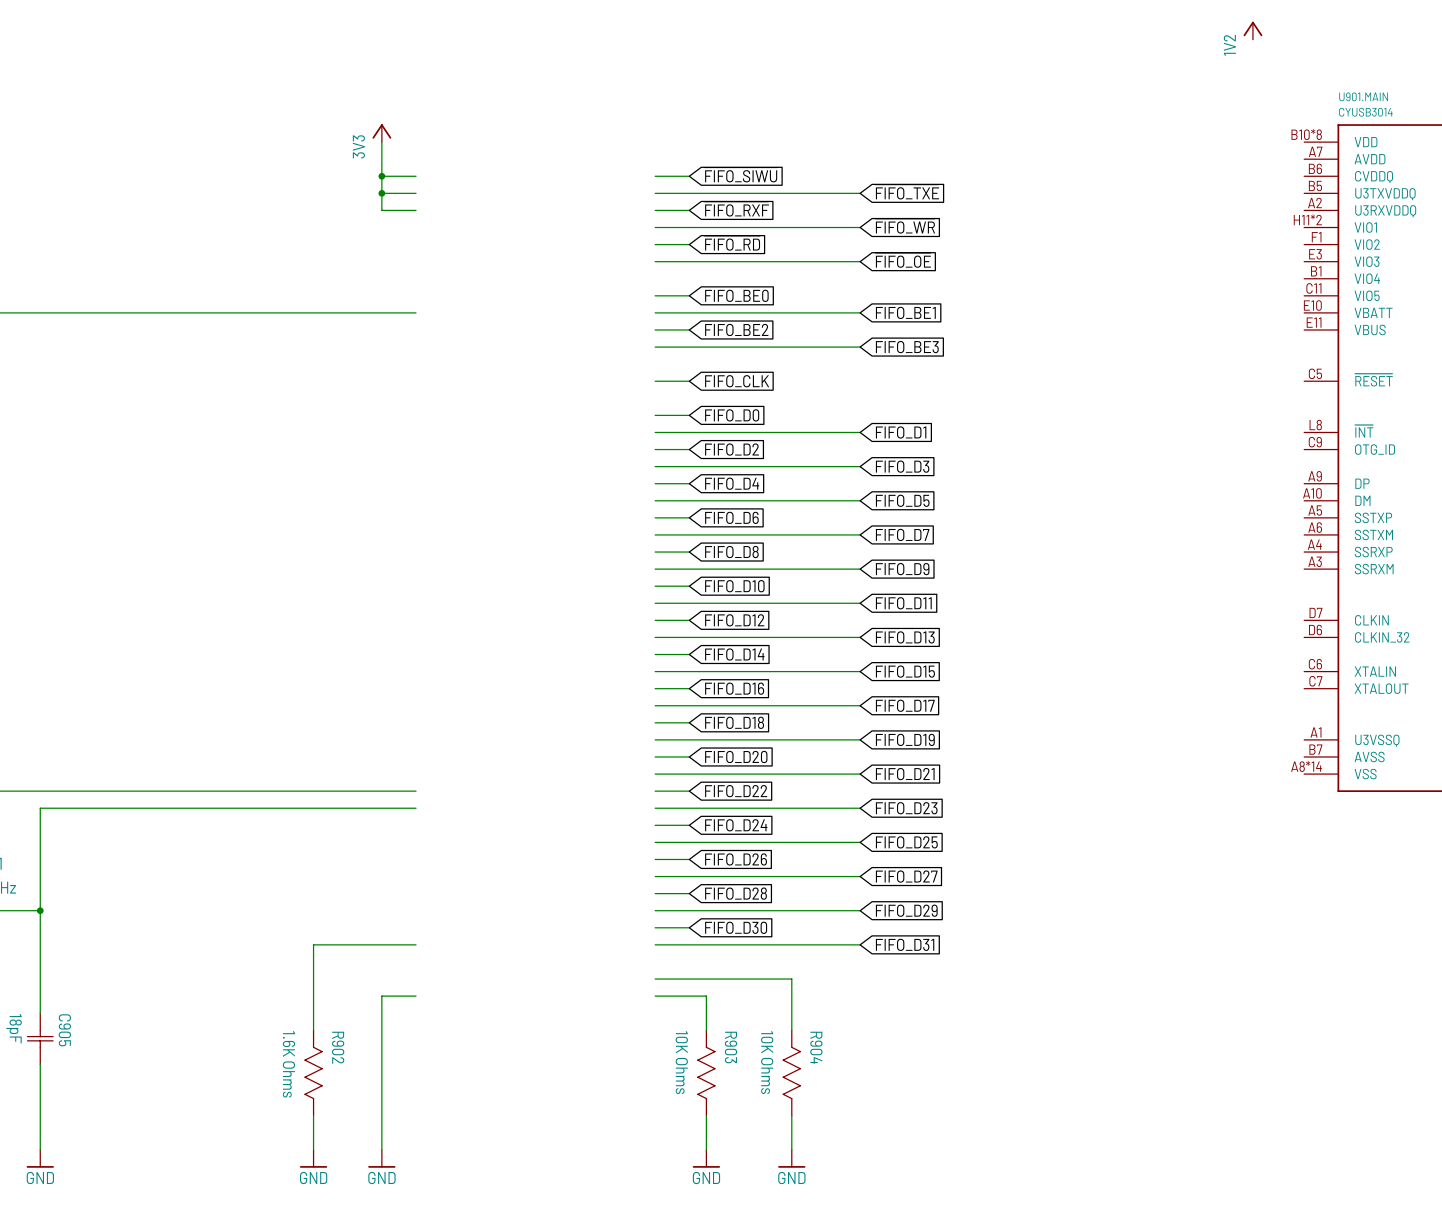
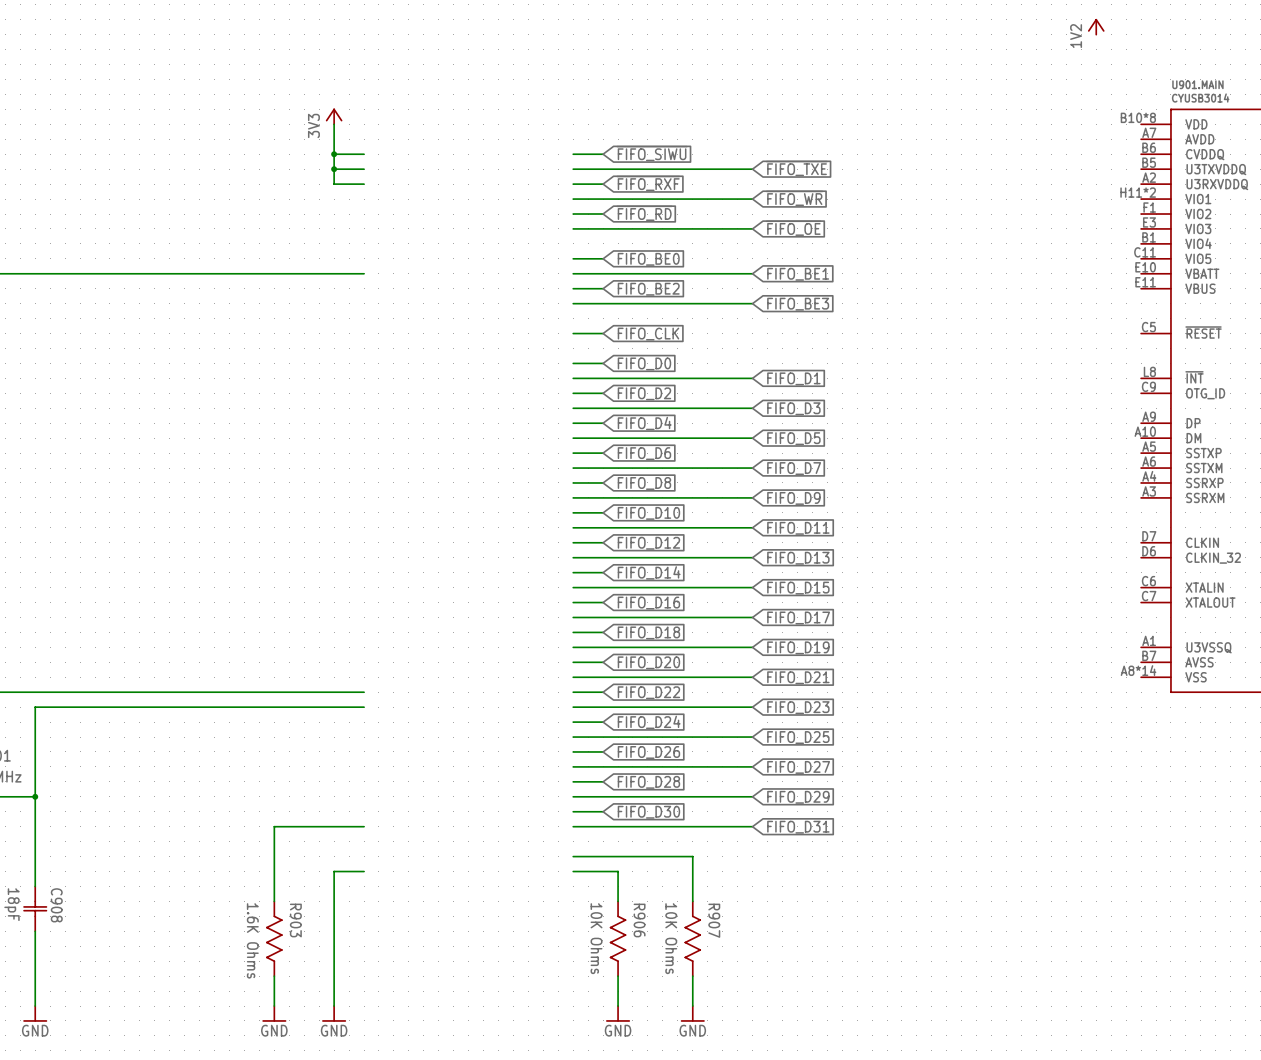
C905 name: C905 (64, 1030) -> C908 (56, 905)
R902 name: R902 (338, 1047) -> R903 (295, 920)
R903 name: R903 (730, 1047) -> R906 (639, 920)
R904 name: R904 (816, 1047) -> R907 (714, 920)

